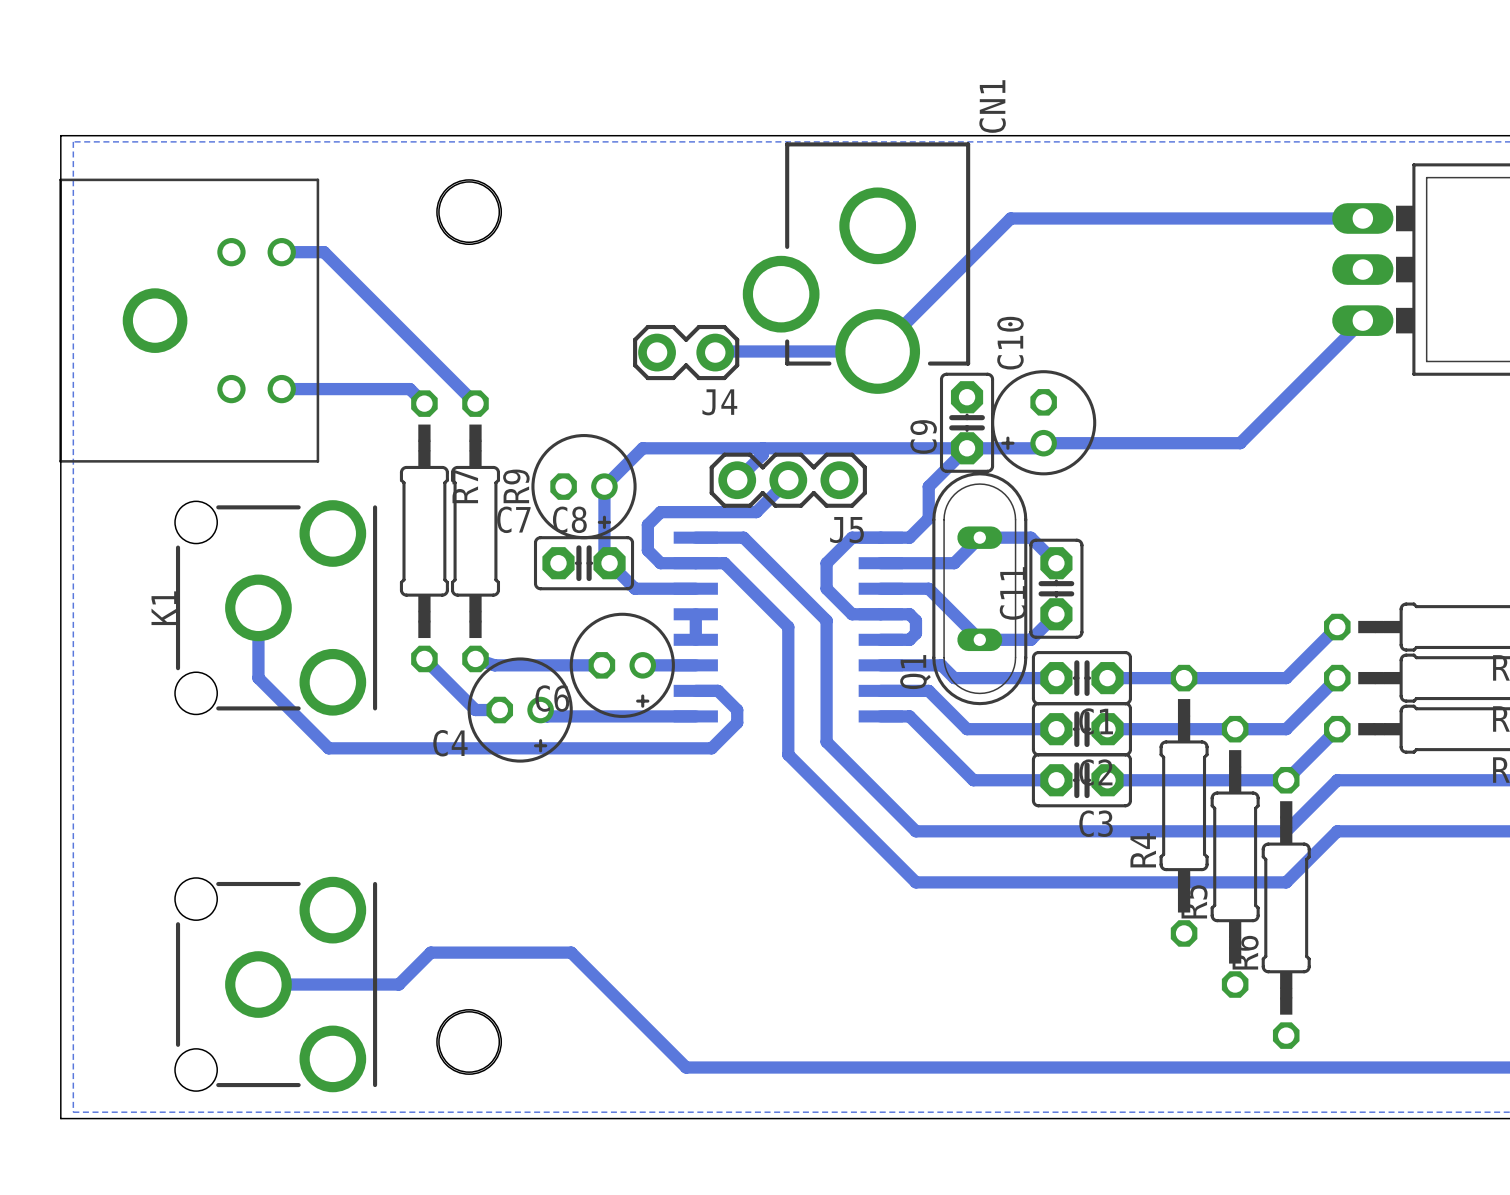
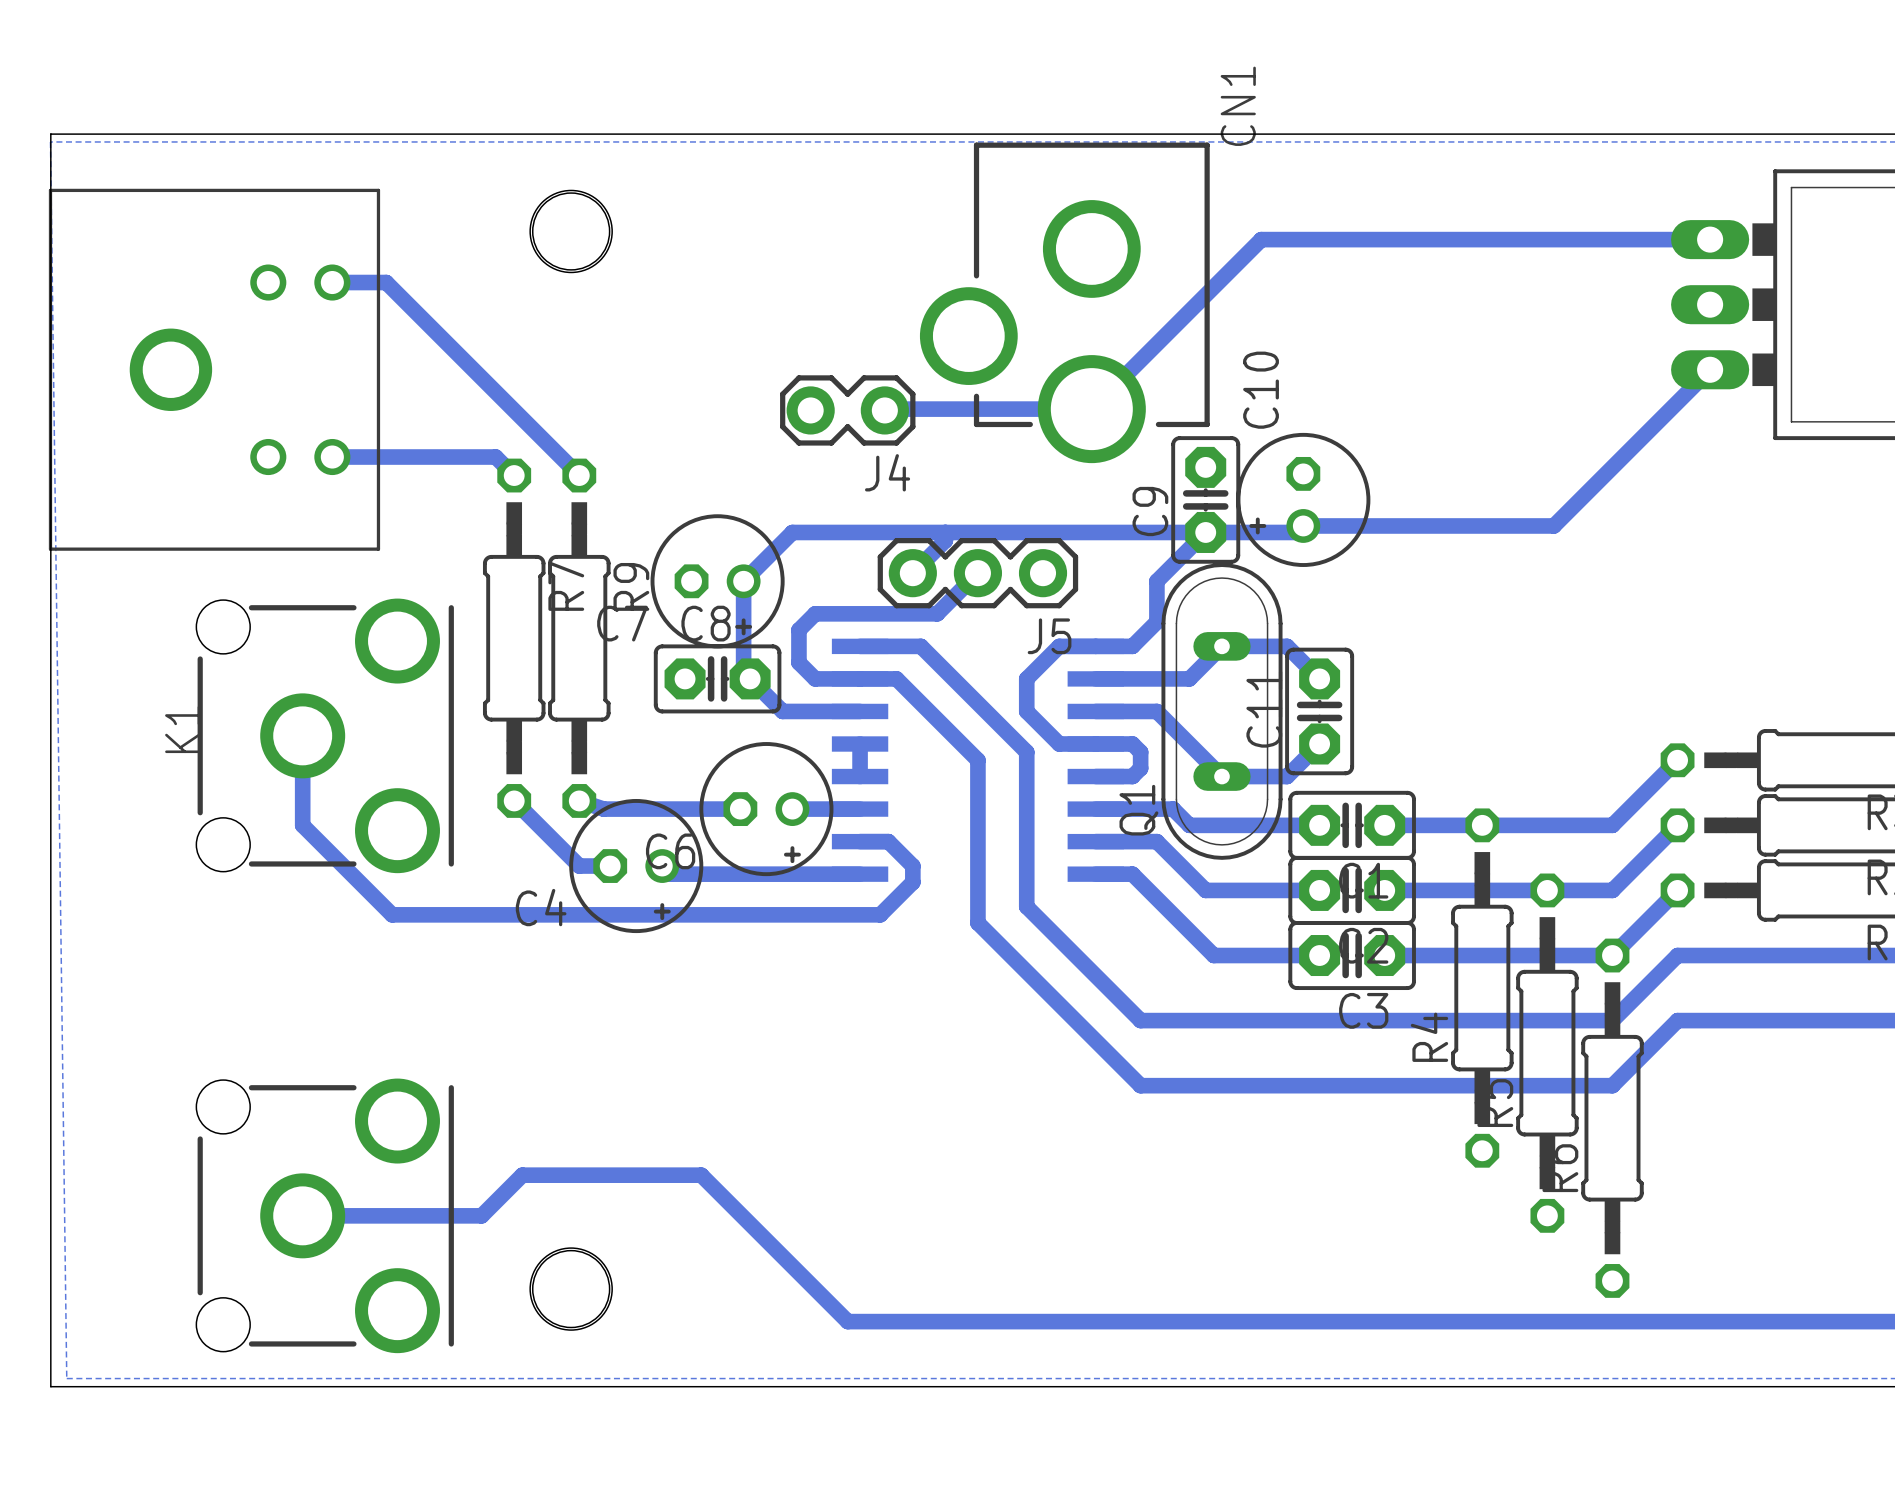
bottom zone outline: (73, 141) (73, 1112) -> (66, 141) (50, 141) (66, 1378)

